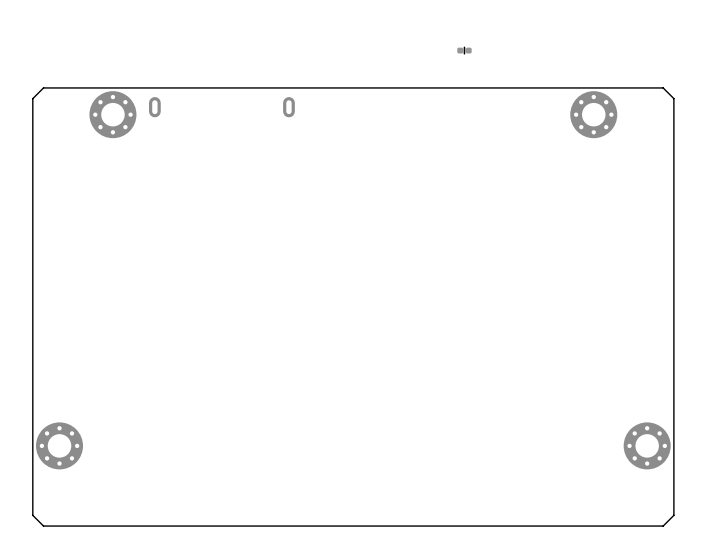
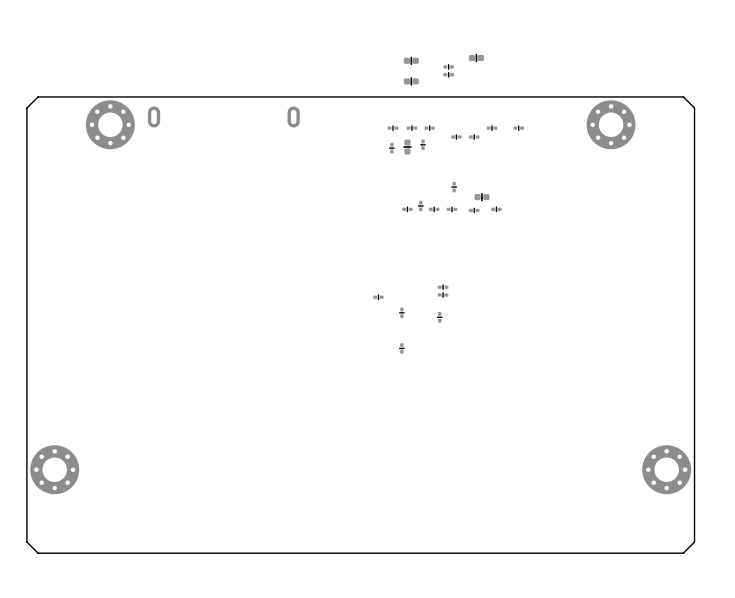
part: none -> (411, 60)
part: none -> (448, 66)
part: none -> (448, 74)
part: none -> (411, 81)
part: none -> (392, 128)
part: none -> (411, 128)
part: none -> (429, 128)
part: none -> (492, 128)
part: none -> (518, 128)
part: none -> (456, 137)
part: none -> (474, 137)
part: none -> (423, 144)
part: none -> (407, 147)
part: none -> (391, 148)
part: none -> (454, 187)
part: none -> (482, 197)
part: none -> (420, 206)
part: none -> (407, 209)
part: none -> (434, 209)
part: none -> (451, 209)
part: none -> (496, 209)
part: none -> (474, 210)
part: none -> (443, 287)
part: none -> (443, 295)
part: none -> (378, 297)
part: none -> (401, 312)
part: none -> (439, 317)
part: none -> (401, 348)

